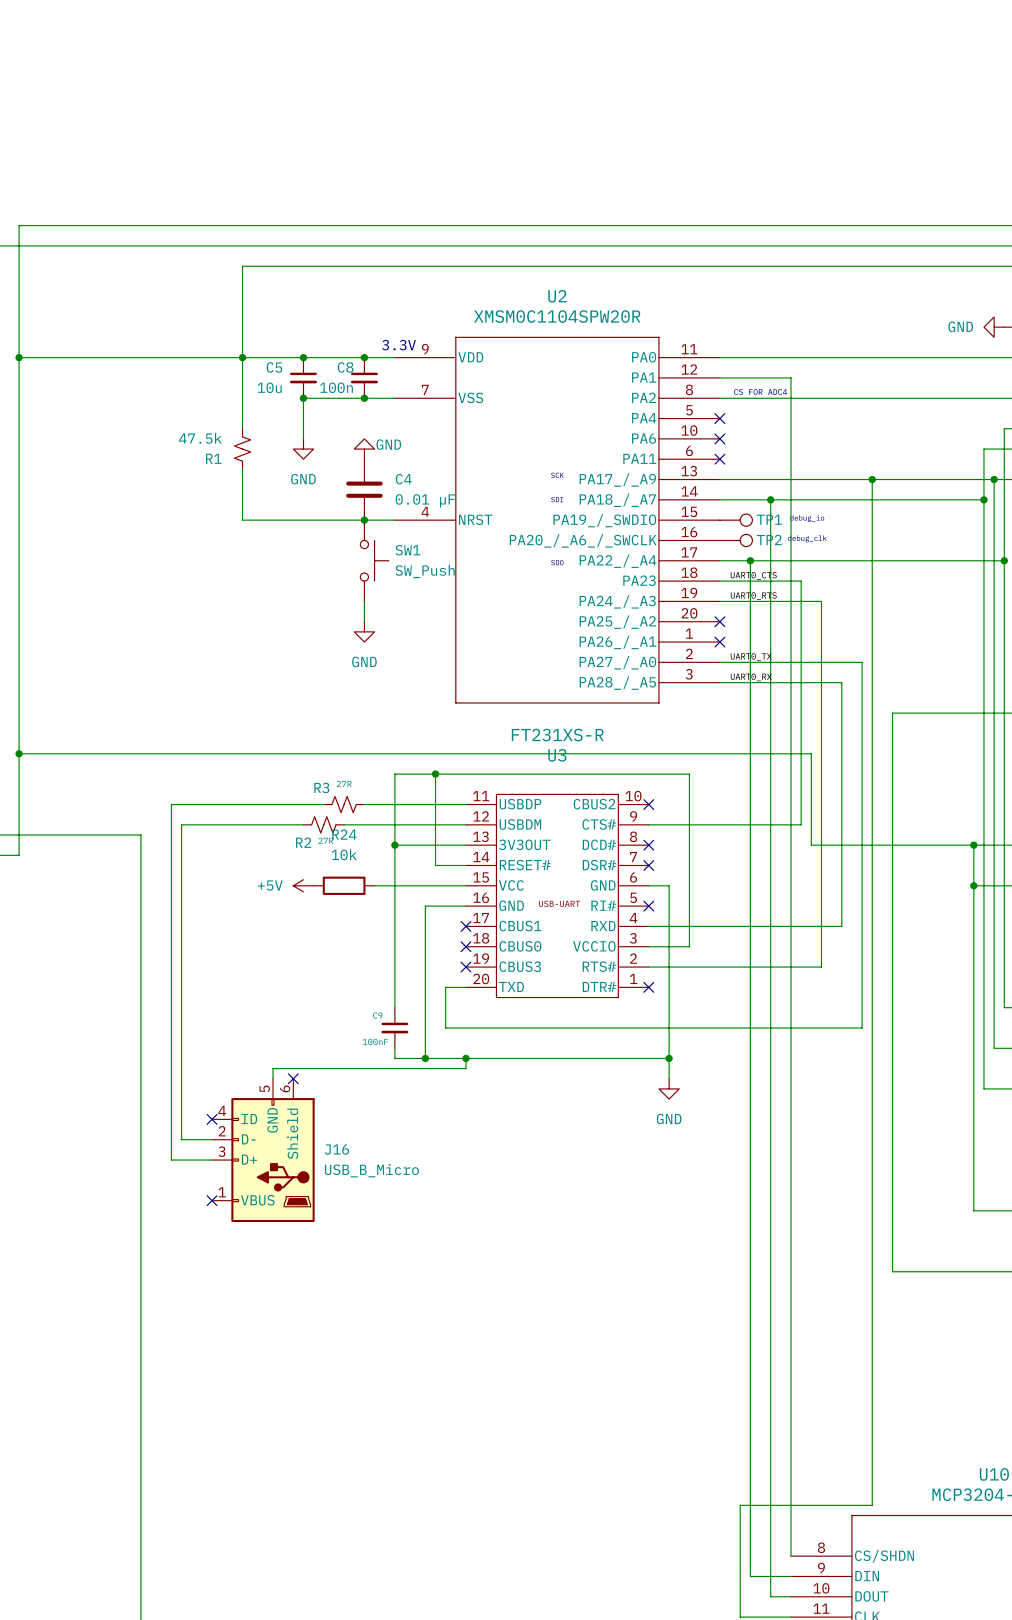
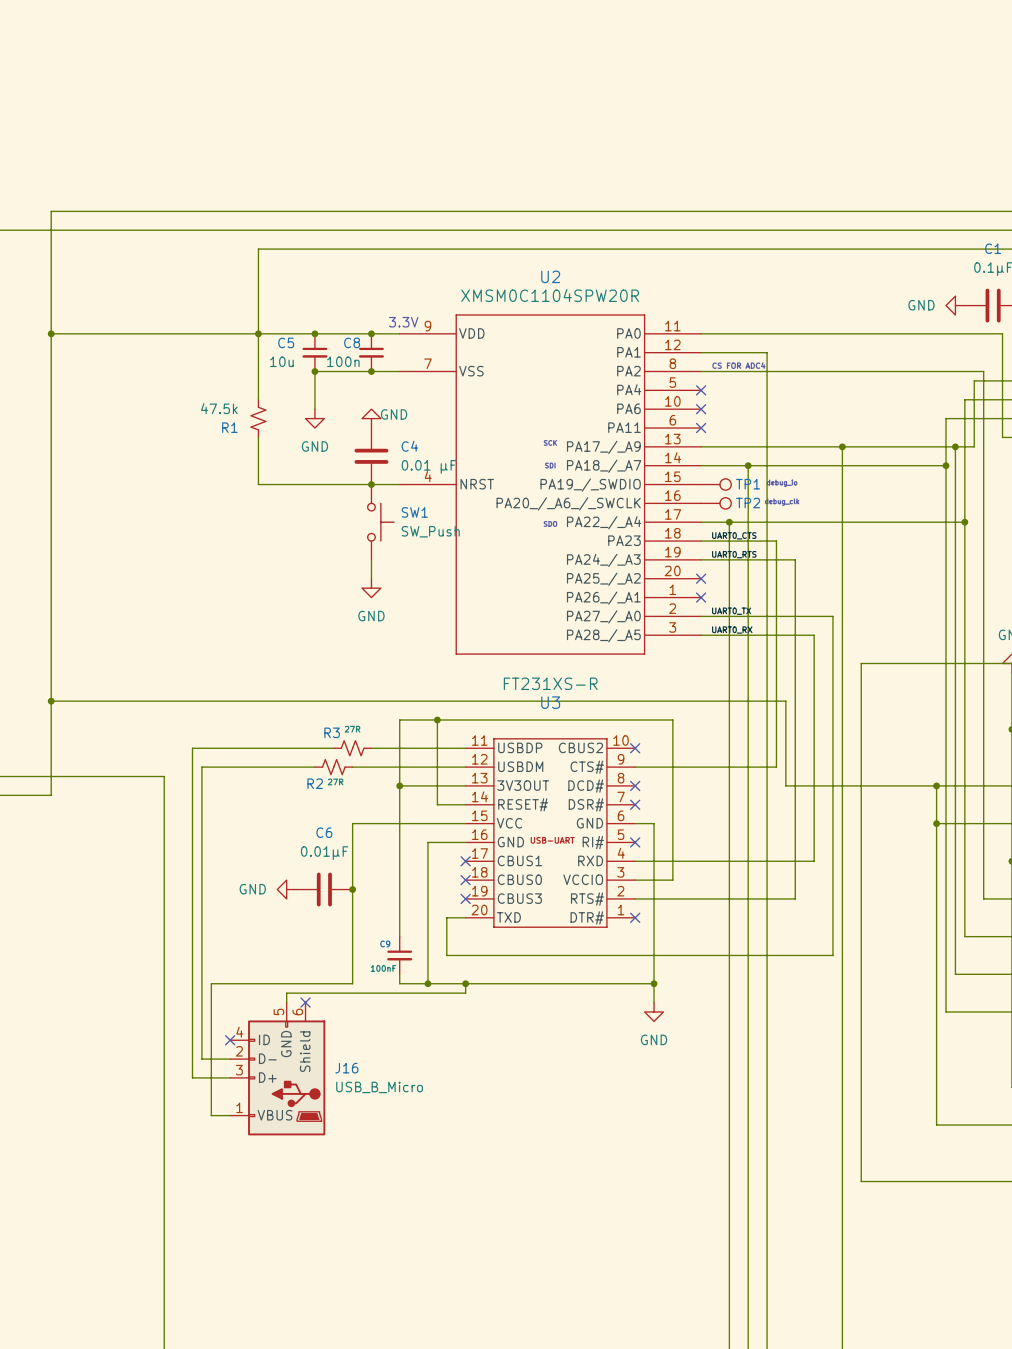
power symbol: +5V (303, 885) -> none
R24: 10k (344, 885) -> none
wire: none -> (380, 823) (352, 823) (352, 983) (211, 983) (211, 1115) (230, 1115)
power symbol: none -> GND (286, 889)
C6: none -> 0.01µF (324, 889)
junction: none -> (352, 889)
no-connect mark: (212, 1200) -> none

